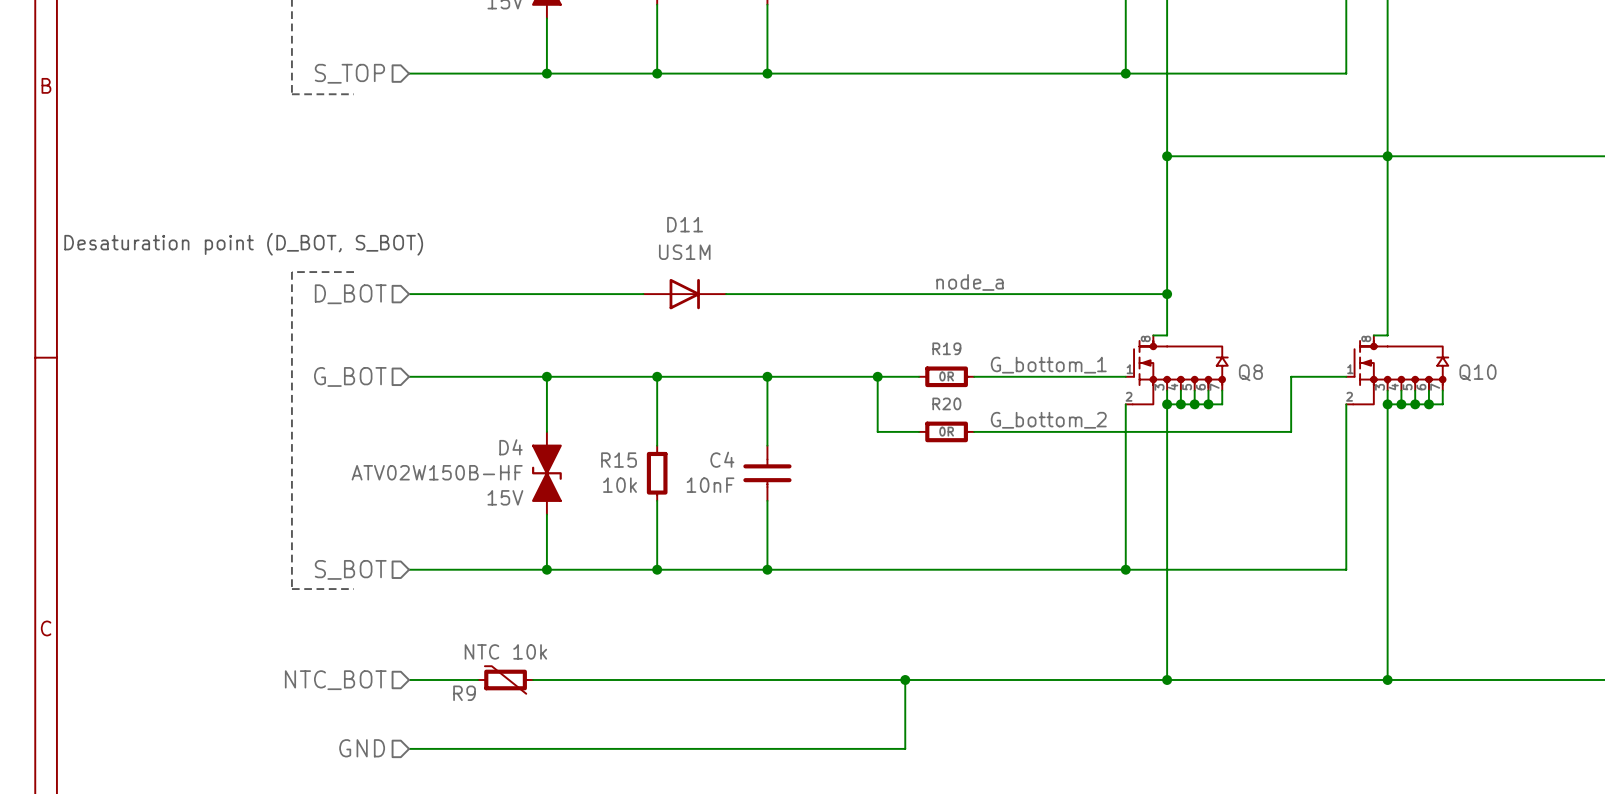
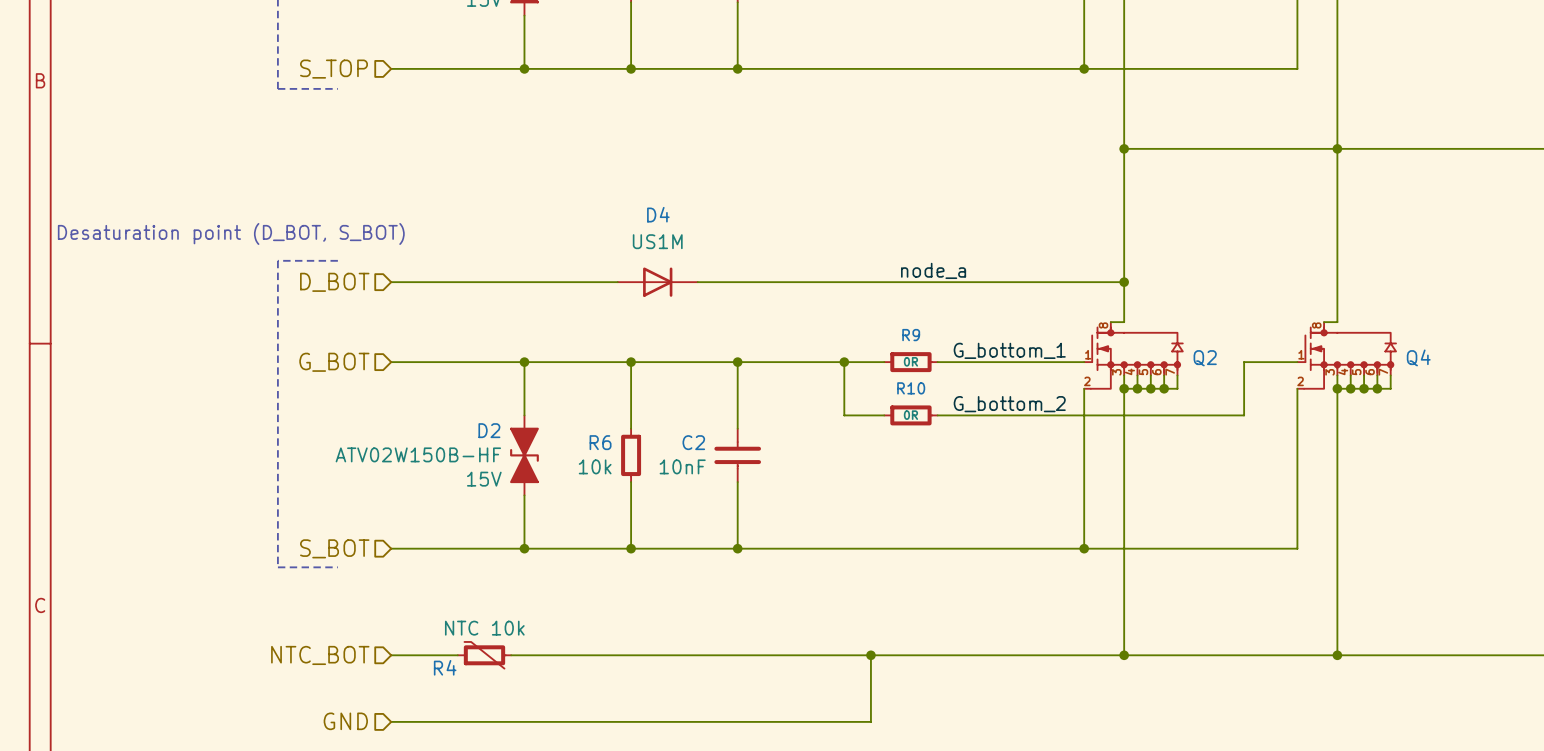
D11 name: D11 (685, 224) -> D4 (658, 214)
R19 name: R19 (946, 348) -> R9 (911, 335)
Q8 name: Q8 (1250, 372) -> Q2 (1205, 358)
Q10 name: Q10 (1477, 372) -> Q4 (1418, 357)
R20 name: R20 (946, 403) -> R10 (911, 388)
D4 name: D4 (510, 447) -> D2 (489, 430)
C4 name: C4 (722, 459) -> C2 (693, 442)
R15 name: R15 (619, 460) -> R6 (600, 442)
R9 name: R9 (464, 693) -> R4 (445, 667)

